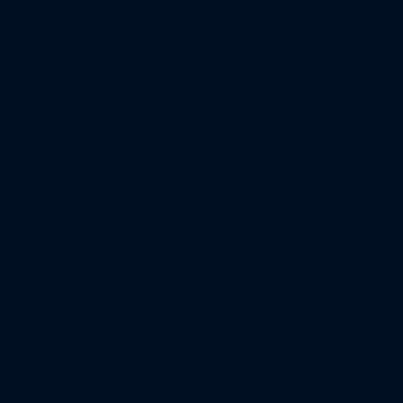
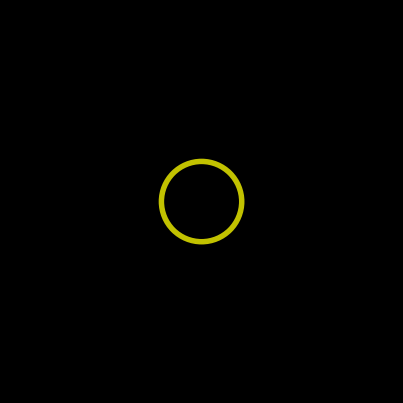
round board edge: none -> [158, 158, 245, 245]

